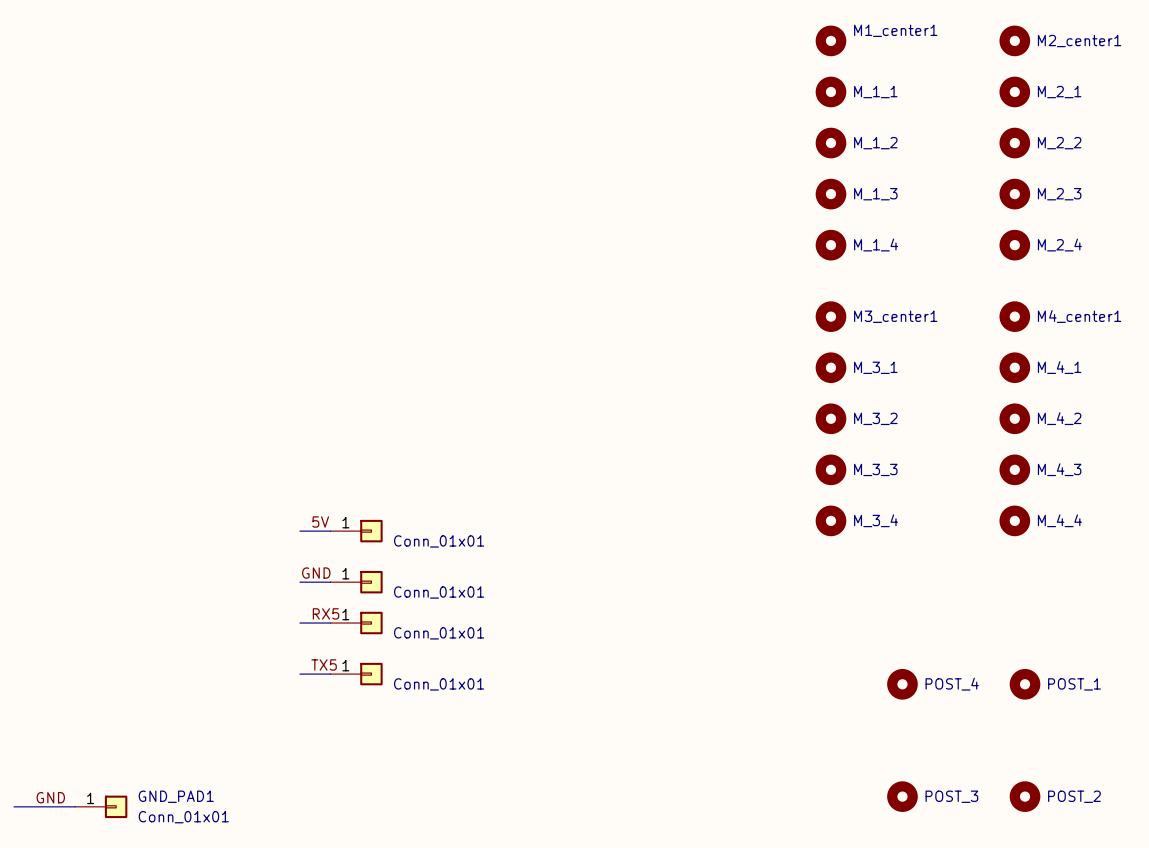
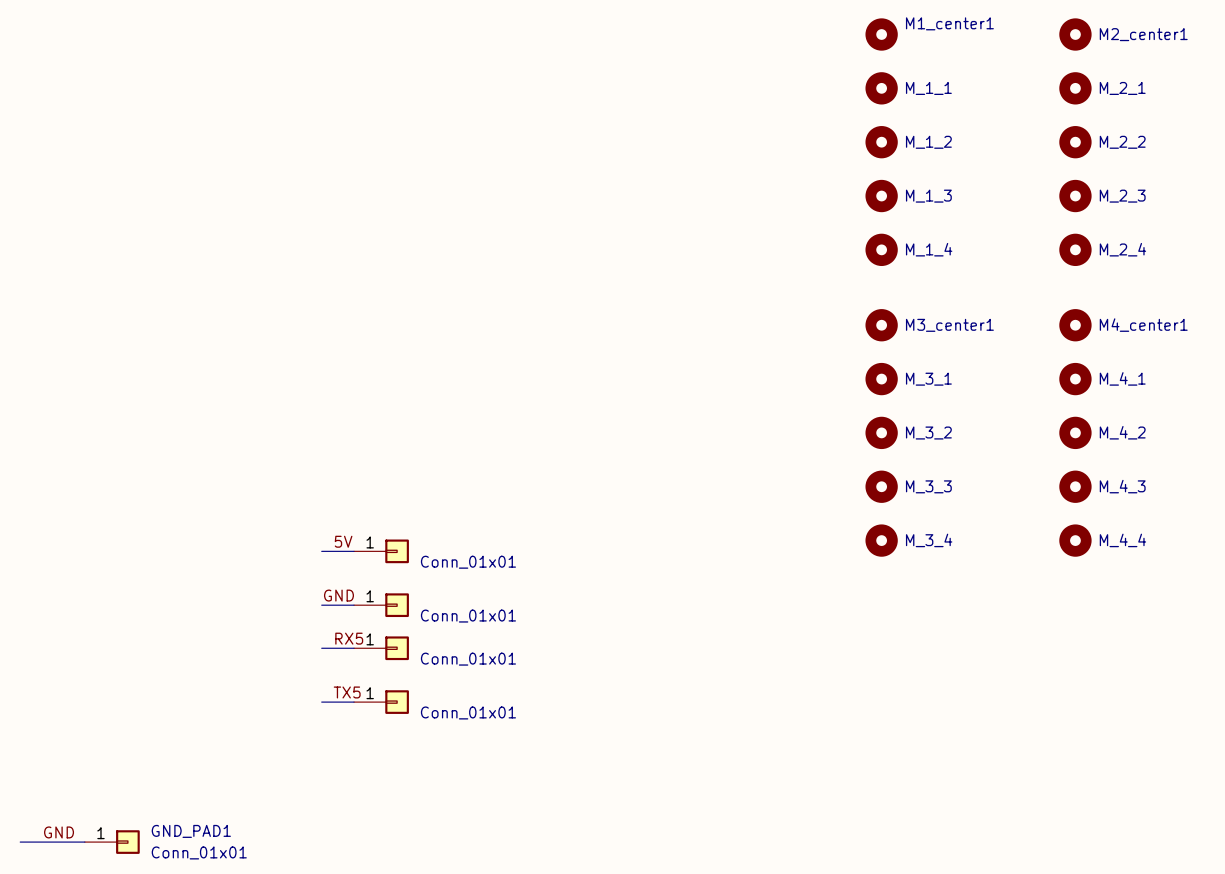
POST_4: (902, 684) -> none
POST_1: (1025, 684) -> none
POST_3: (902, 796) -> none
POST_2: (1025, 796) -> none

